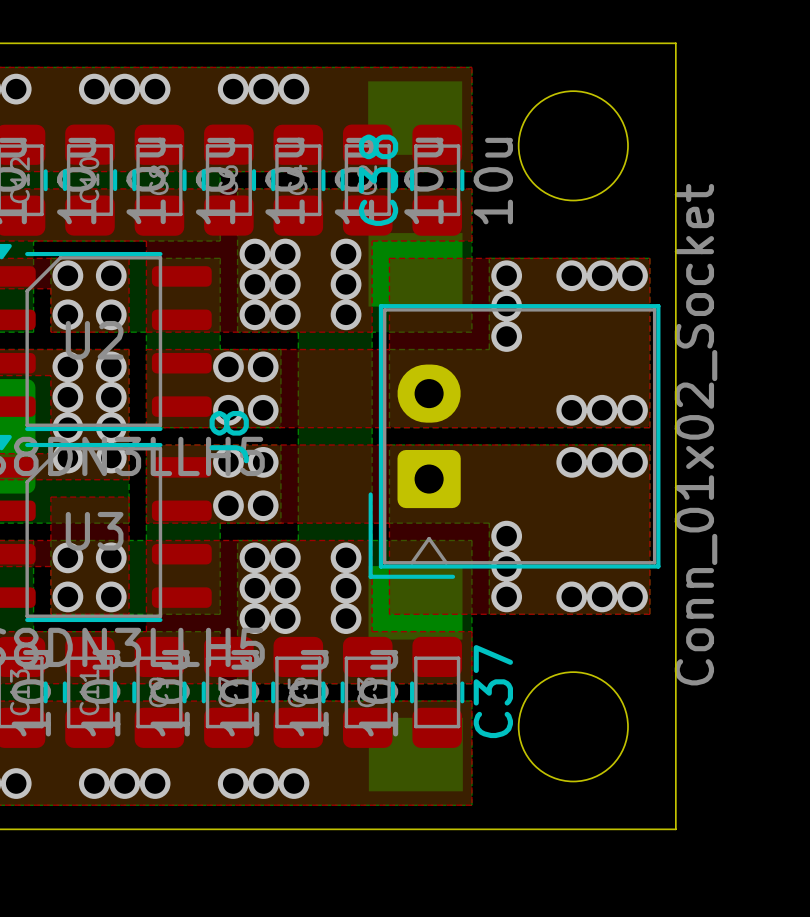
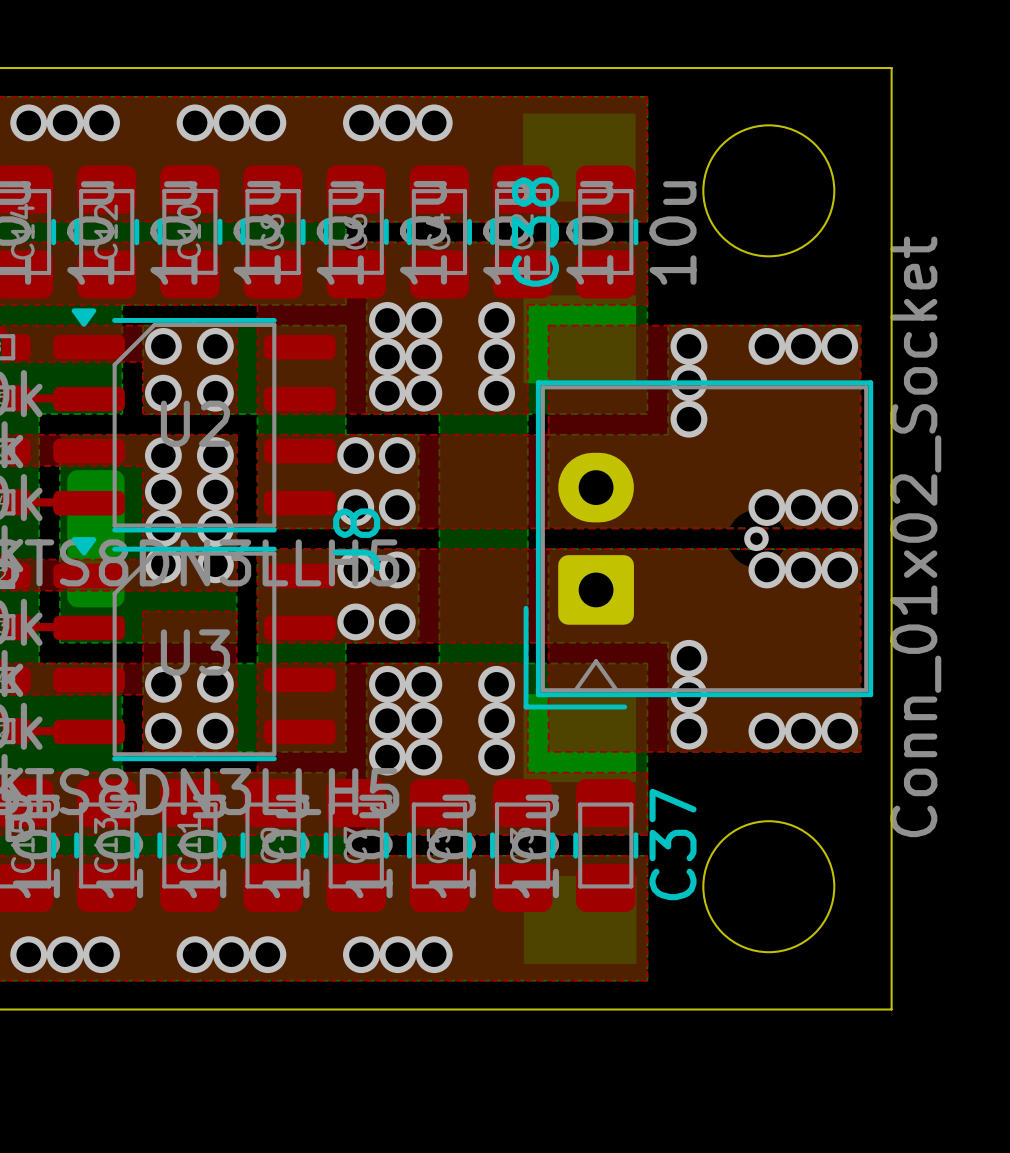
via: none -> (756, 538)

